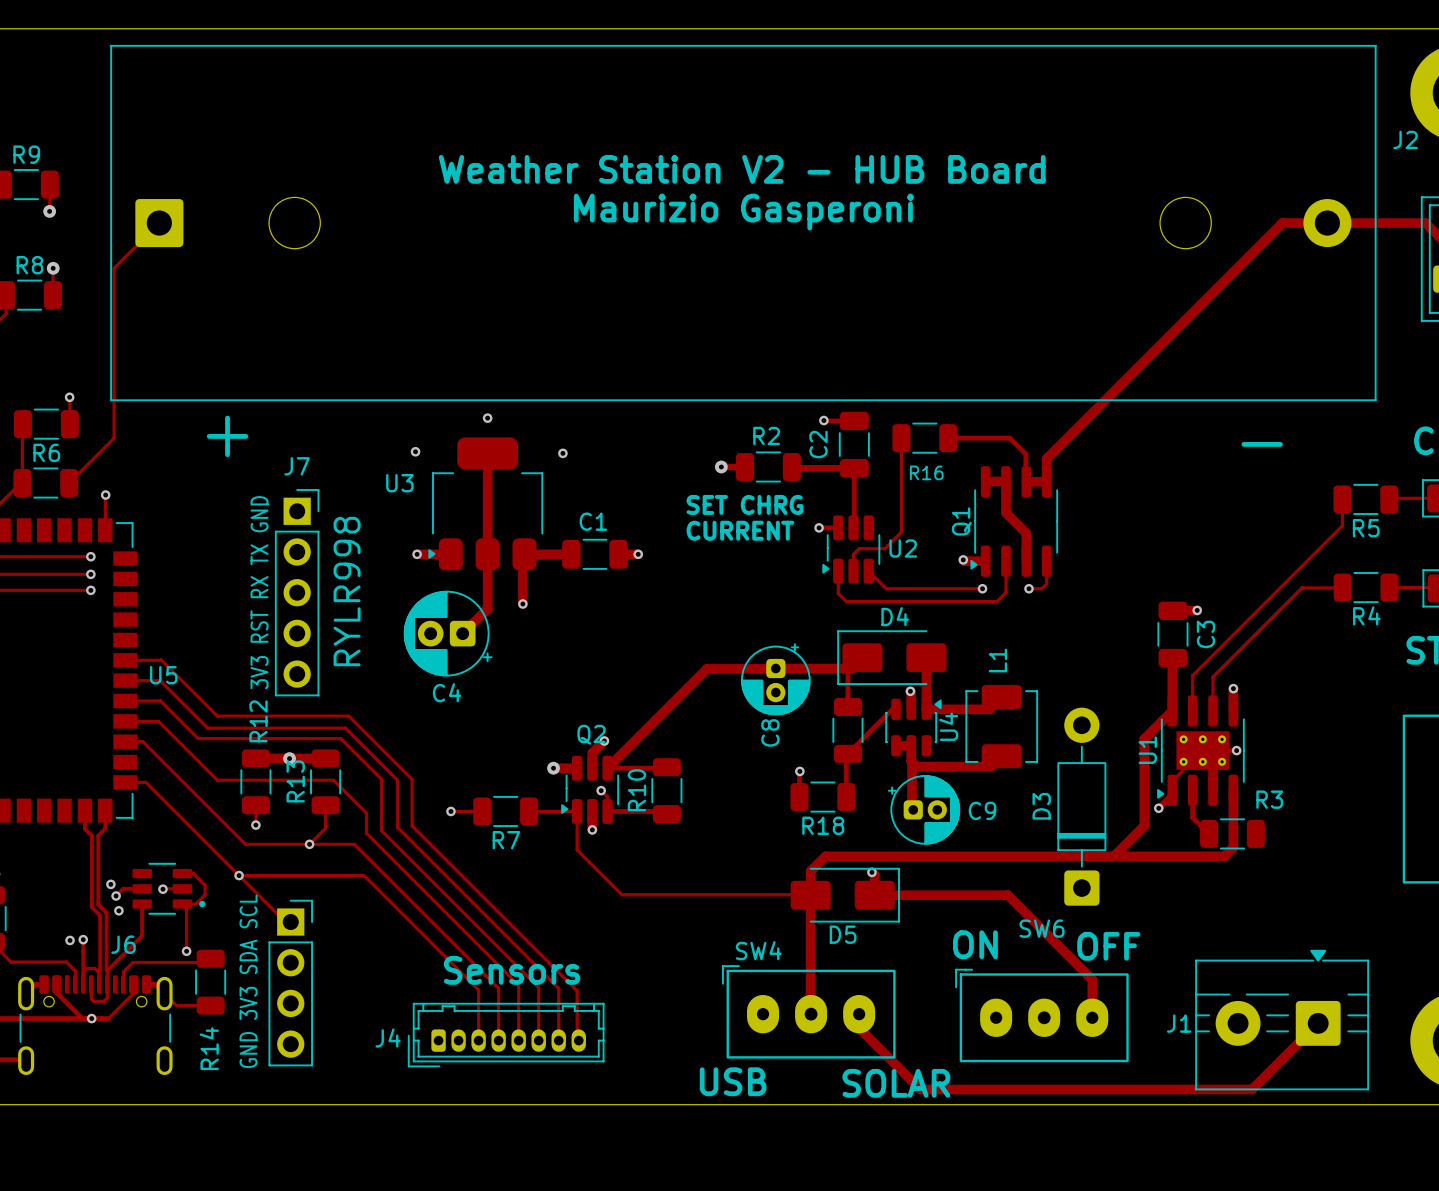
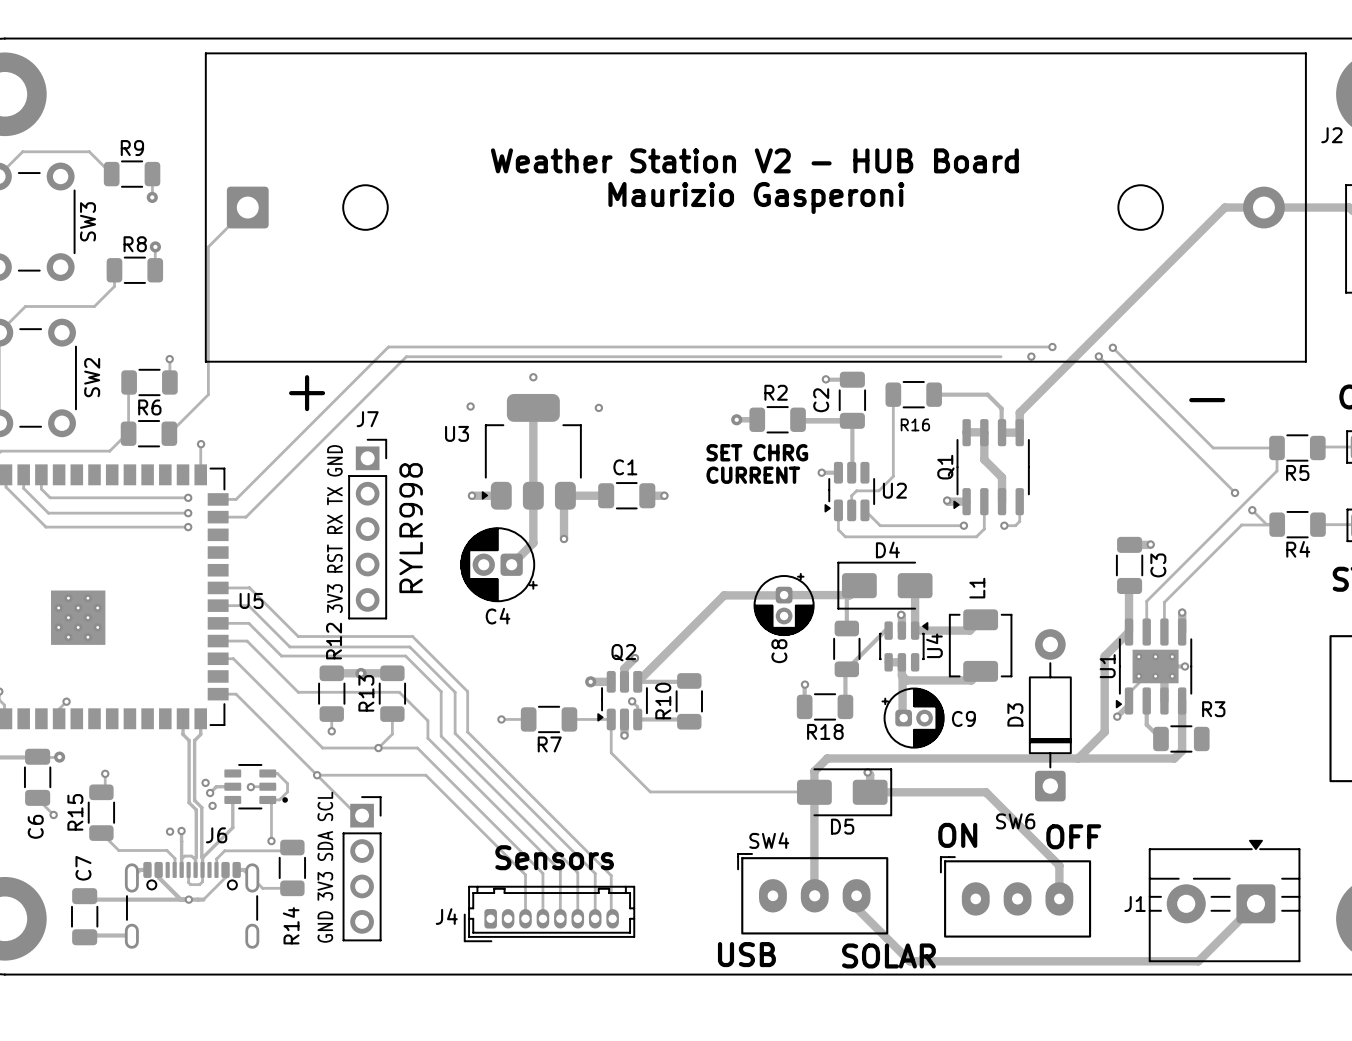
track: none -> (1052, 347) (388, 347) (236, 499) (218, 499)
via: none -> (1052, 347)
track: none -> (1112, 347) (1213, 447) (1277, 447)
via: none -> (1112, 347)
track: none -> (1001, 356) (406, 356) (245, 517) (218, 517)
via: none -> (1031, 356)
track: none -> (1098, 356) (1235, 492)
via: none -> (1098, 356)
via: none -> (1235, 492)
track: none -> (1252, 510) (1266, 524) (1277, 524)
via: none -> (1252, 510)

